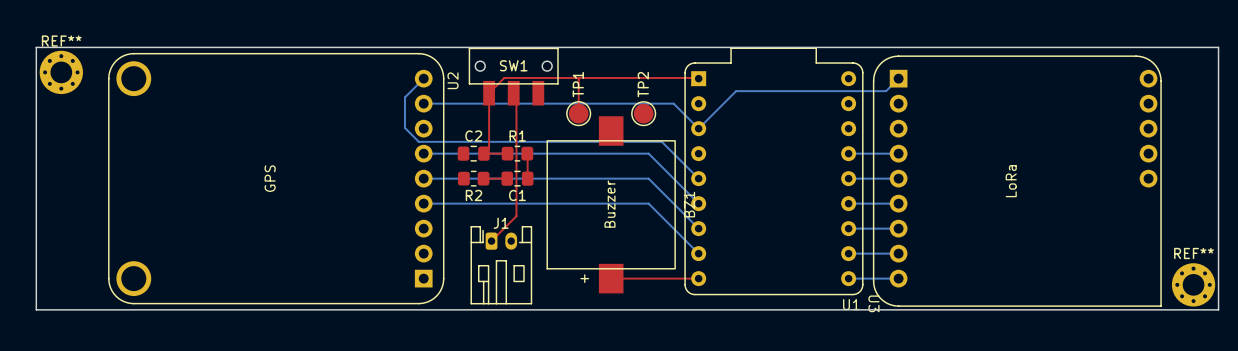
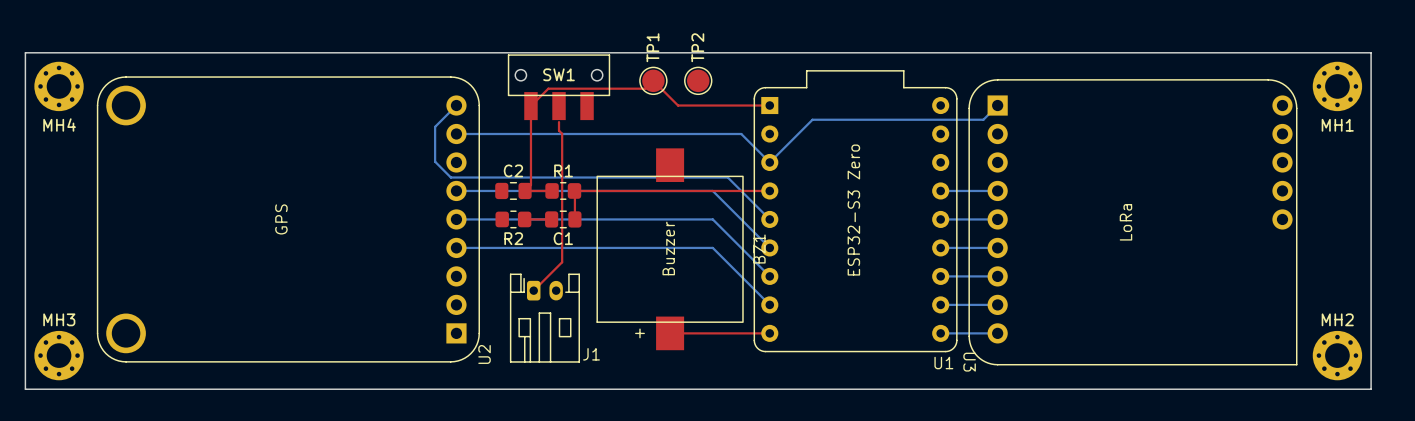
board edge: (36, 47) (1218, 47) (1218, 309) (36, 309) (36, 47) -> (25, 52) (25, 389) (1371, 389) (1371, 52) (25, 52)
MH4: none -> (59, 86)
MH1: none -> (1337, 86)
REF**: (61, 72) -> none
SW1 position: (513, 76) -> (559, 87)
top track: (579, 77) (578, 113) -> none
U2 name position: U2 (453, 80) -> U2 (484, 354)
top track: (691, 85) (697, 77) (504, 77) (489, 93) -> (769, 105) (678, 105) (653, 80) (645, 88) (548, 88) (530, 106) (530, 122)
TP1 position: (578, 113) -> (653, 80)
TP2 position: (643, 113) -> (698, 80)
top track: none -> (574, 190) (769, 190)
U1 text: none -> ESP32-S3 Zero (853, 210)
J1 name position: J1 (501, 223) -> J1 (591, 354)
REF**: (1193, 284) -> none
MH3: none -> (59, 355)
MH2: none -> (1337, 355)

